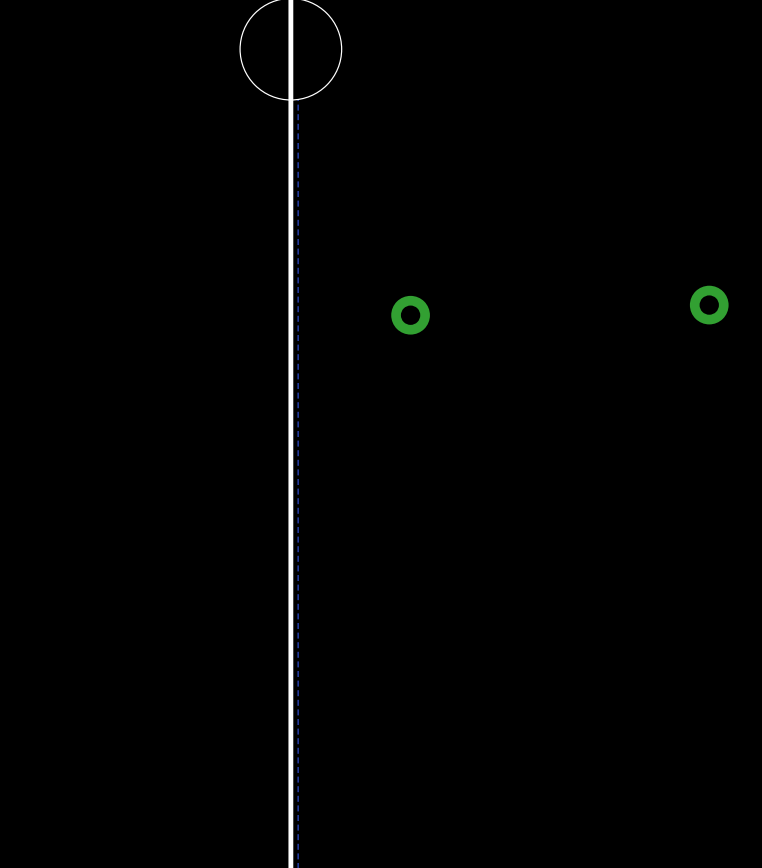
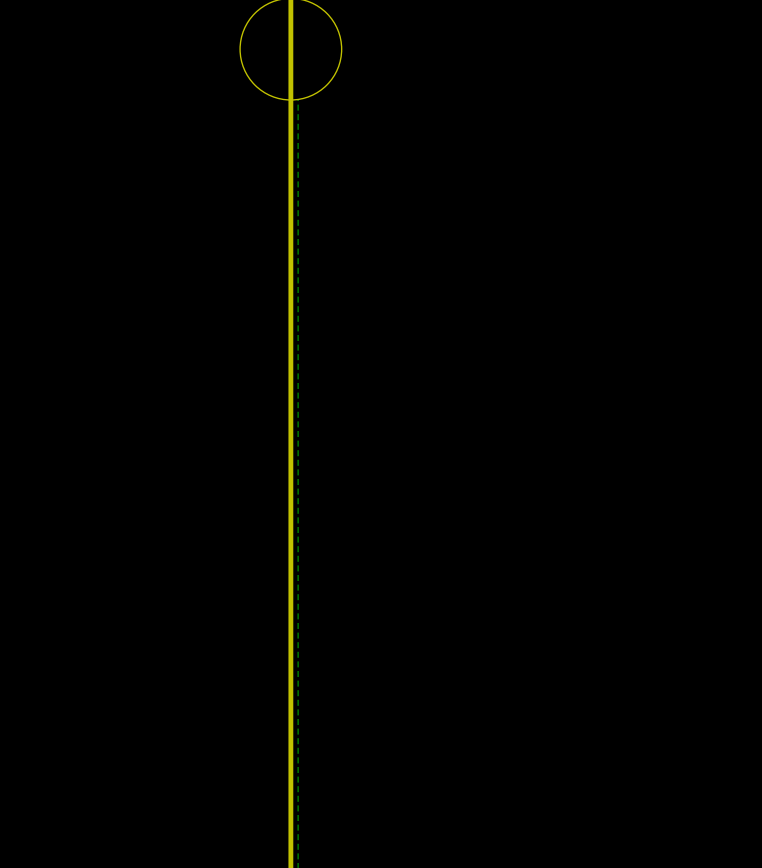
via: (709, 305) -> none
via: (410, 315) -> none

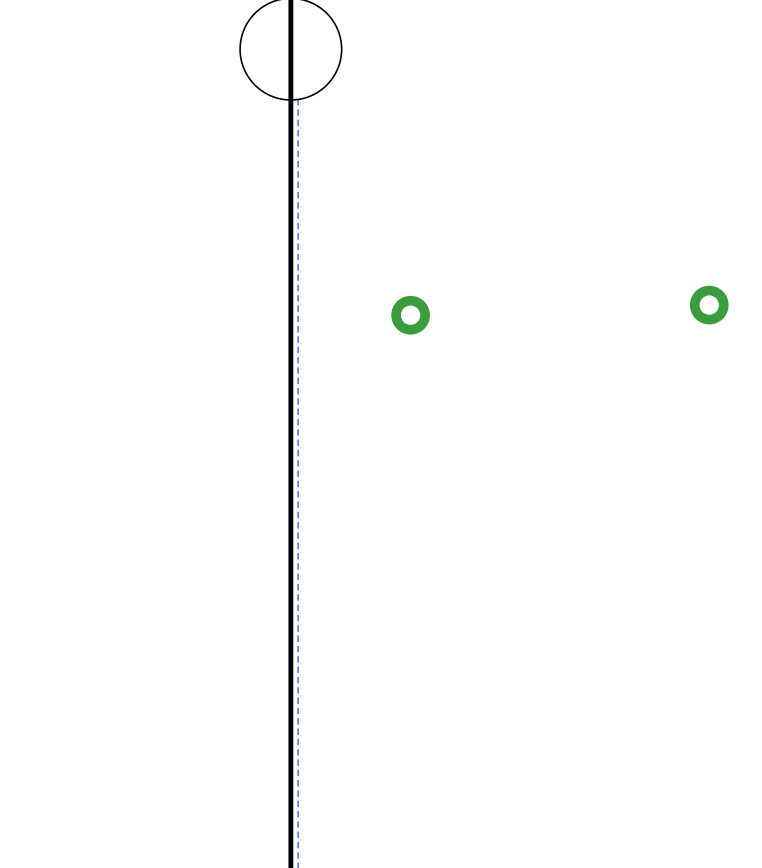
via: none -> (709, 305)
via: none -> (410, 315)

